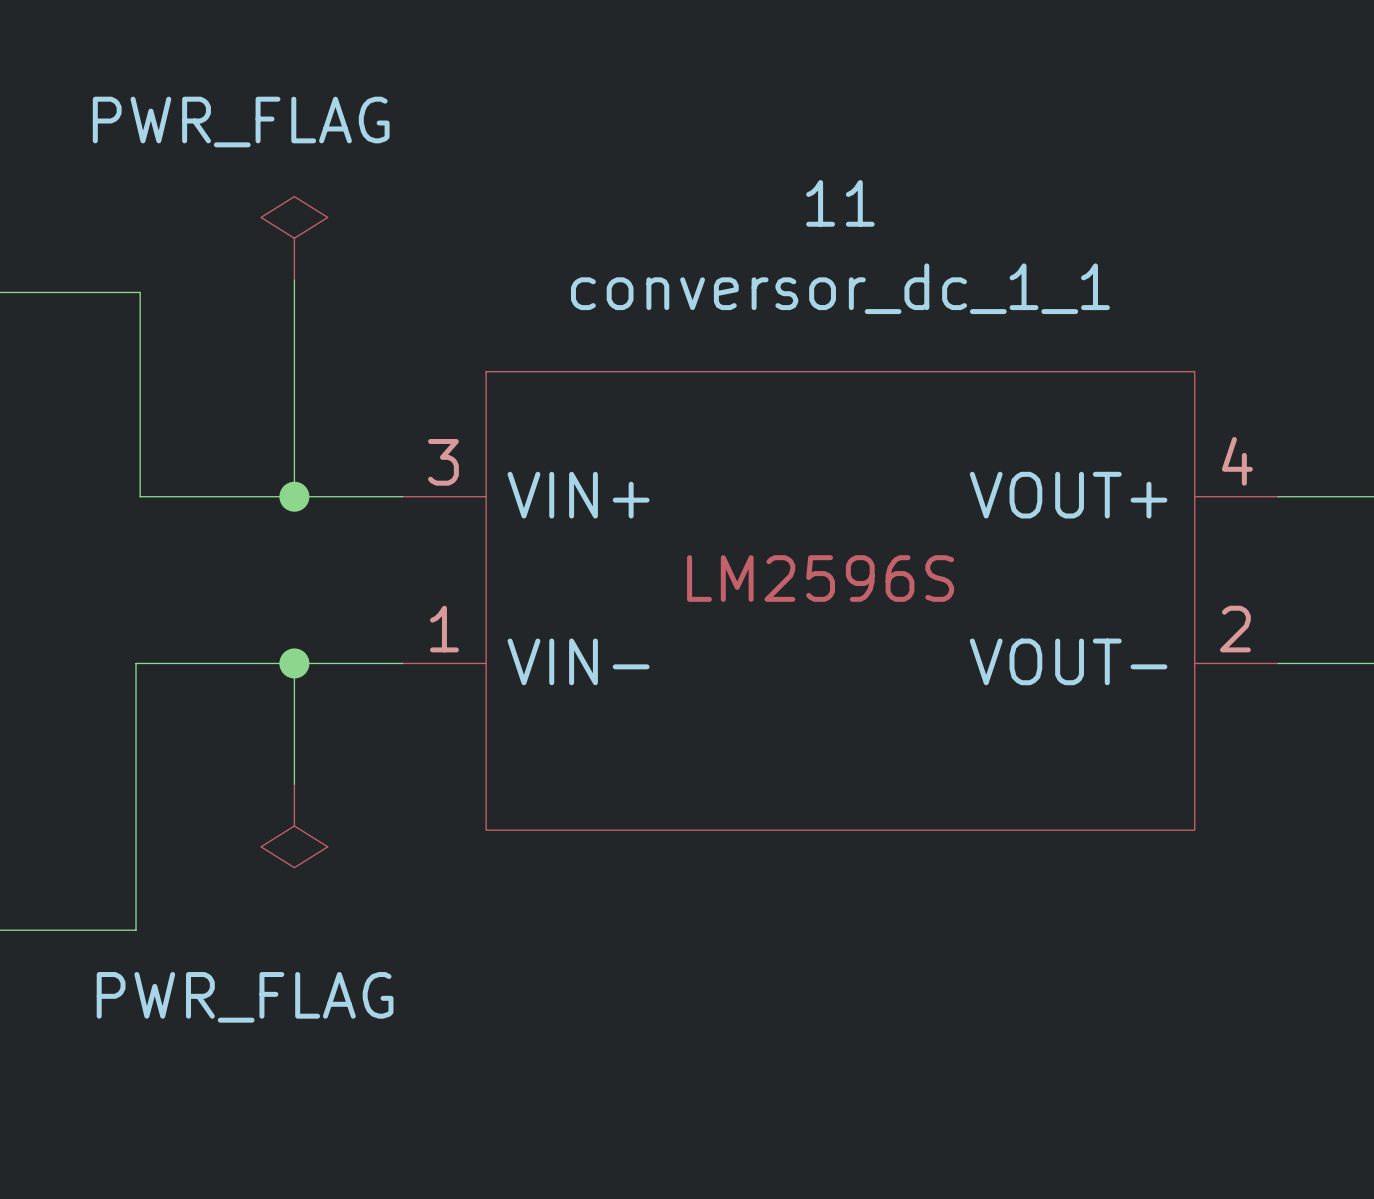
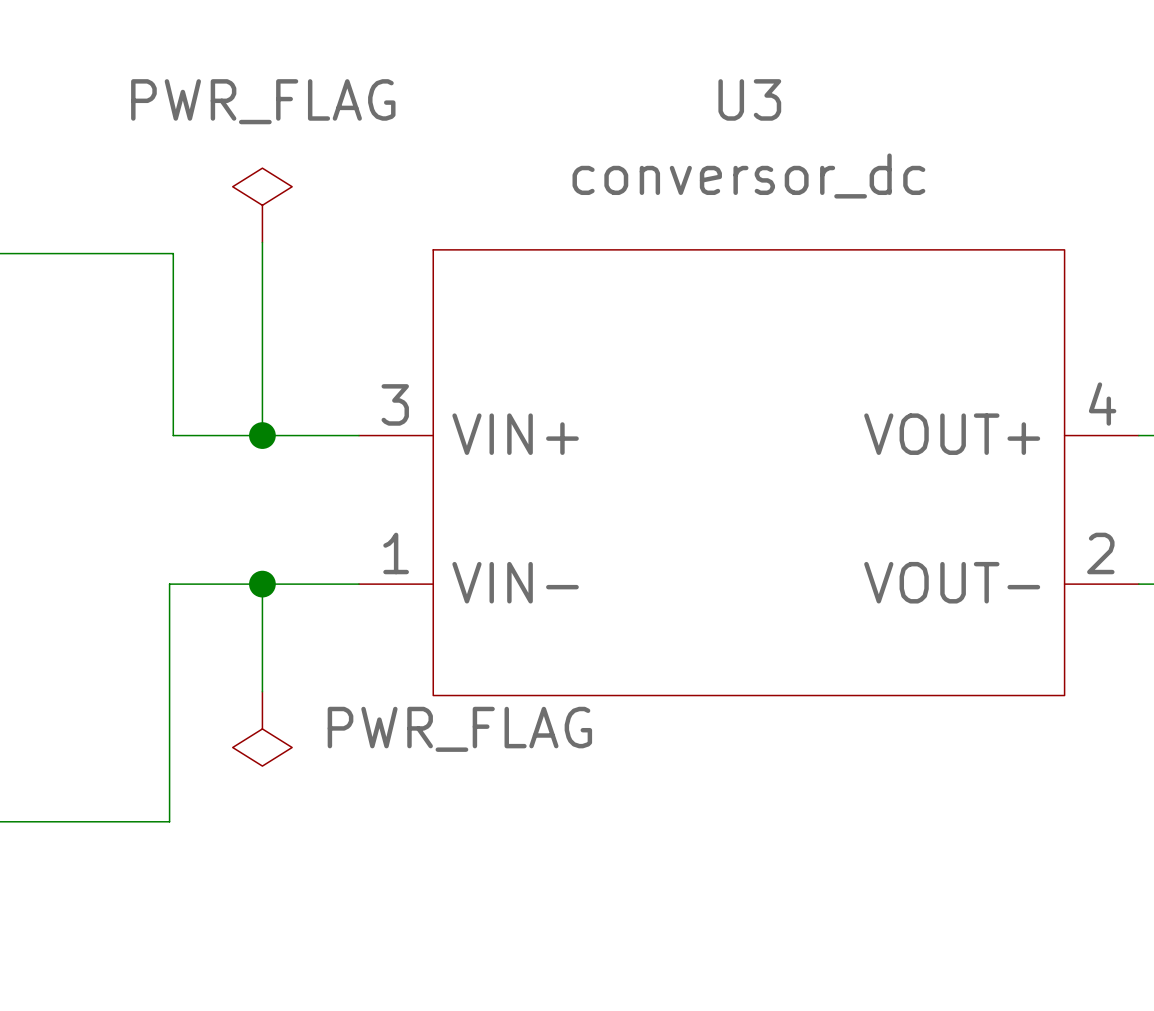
power symbol text position: PWR_FLAG (241, 122) -> PWR_FLAG (263, 101)
wire: (140, 292) (140, 496) (194, 496) -> (125, 253) (173, 253) (173, 435)
U3: none -> conversor_dc (748, 472)
11: conversor_dc_1_1 (840, 600) -> none
wire: (190, 663) (136, 663) (136, 930) -> (169, 584) (169, 821) (121, 821)
power symbol text position: PWR_FLAG (245, 997) -> PWR_FLAG (459, 729)

